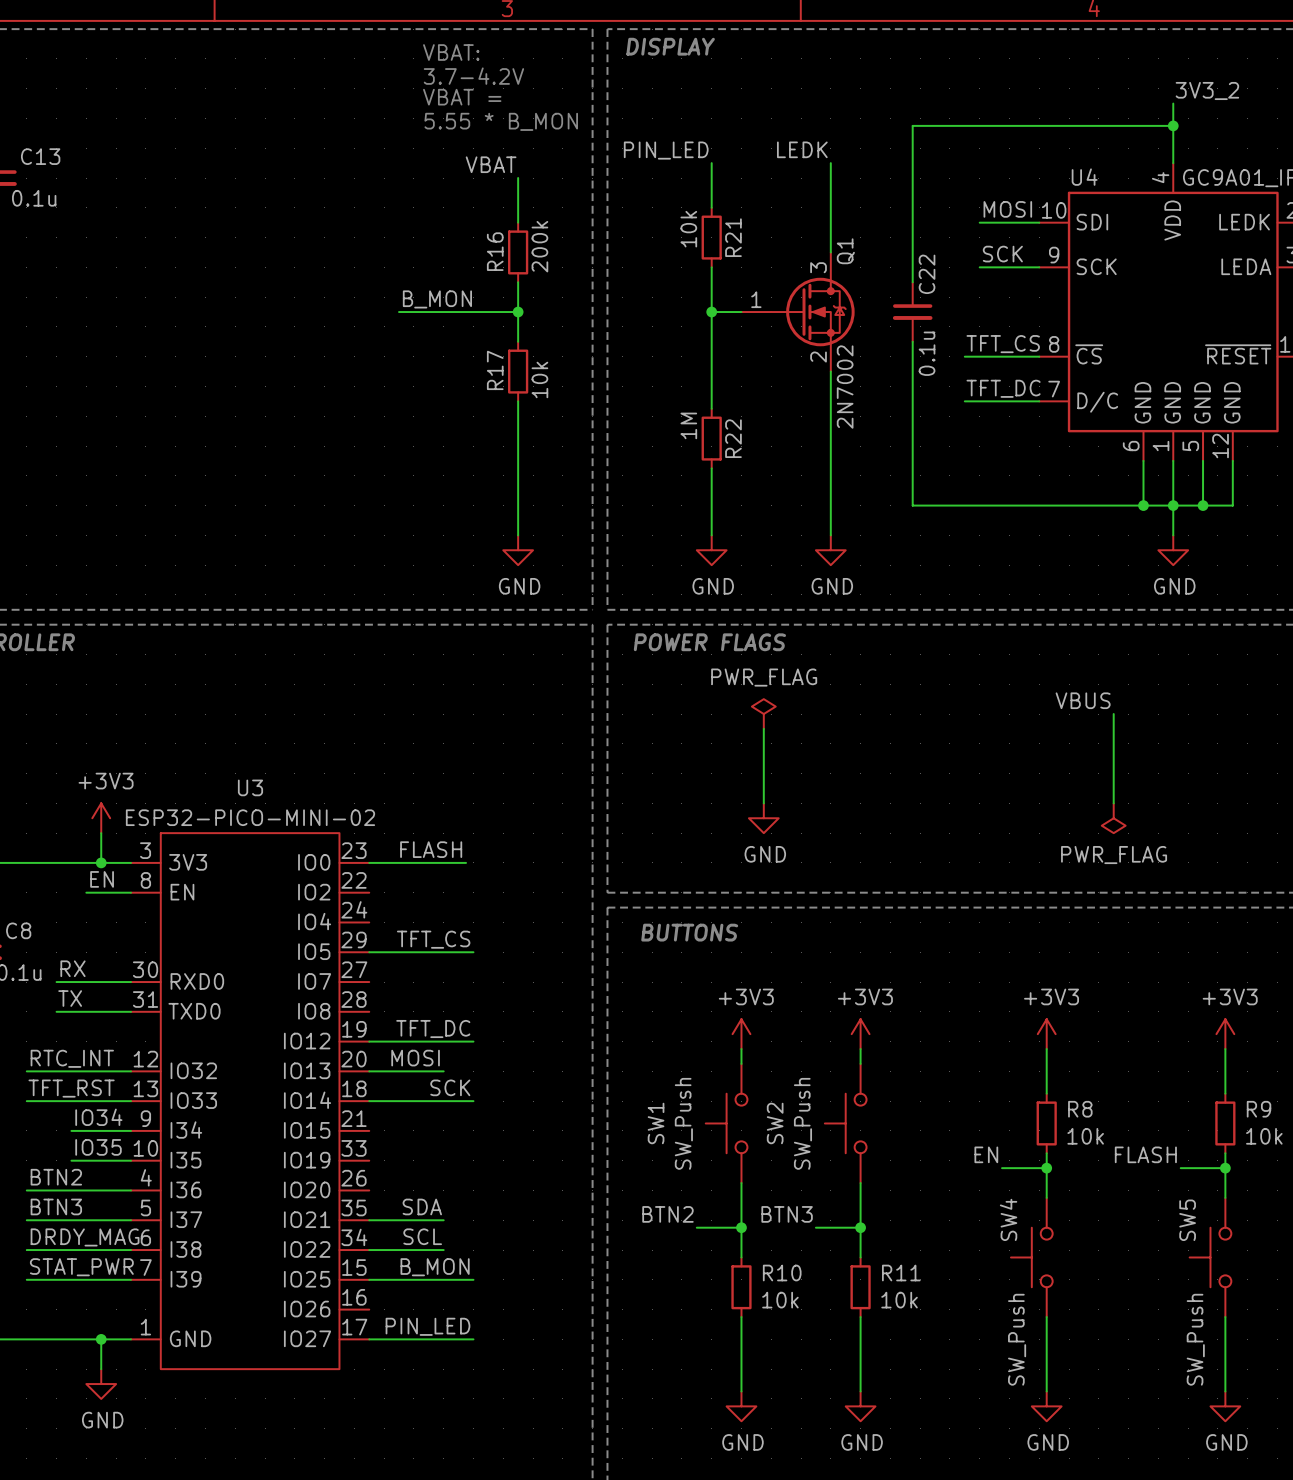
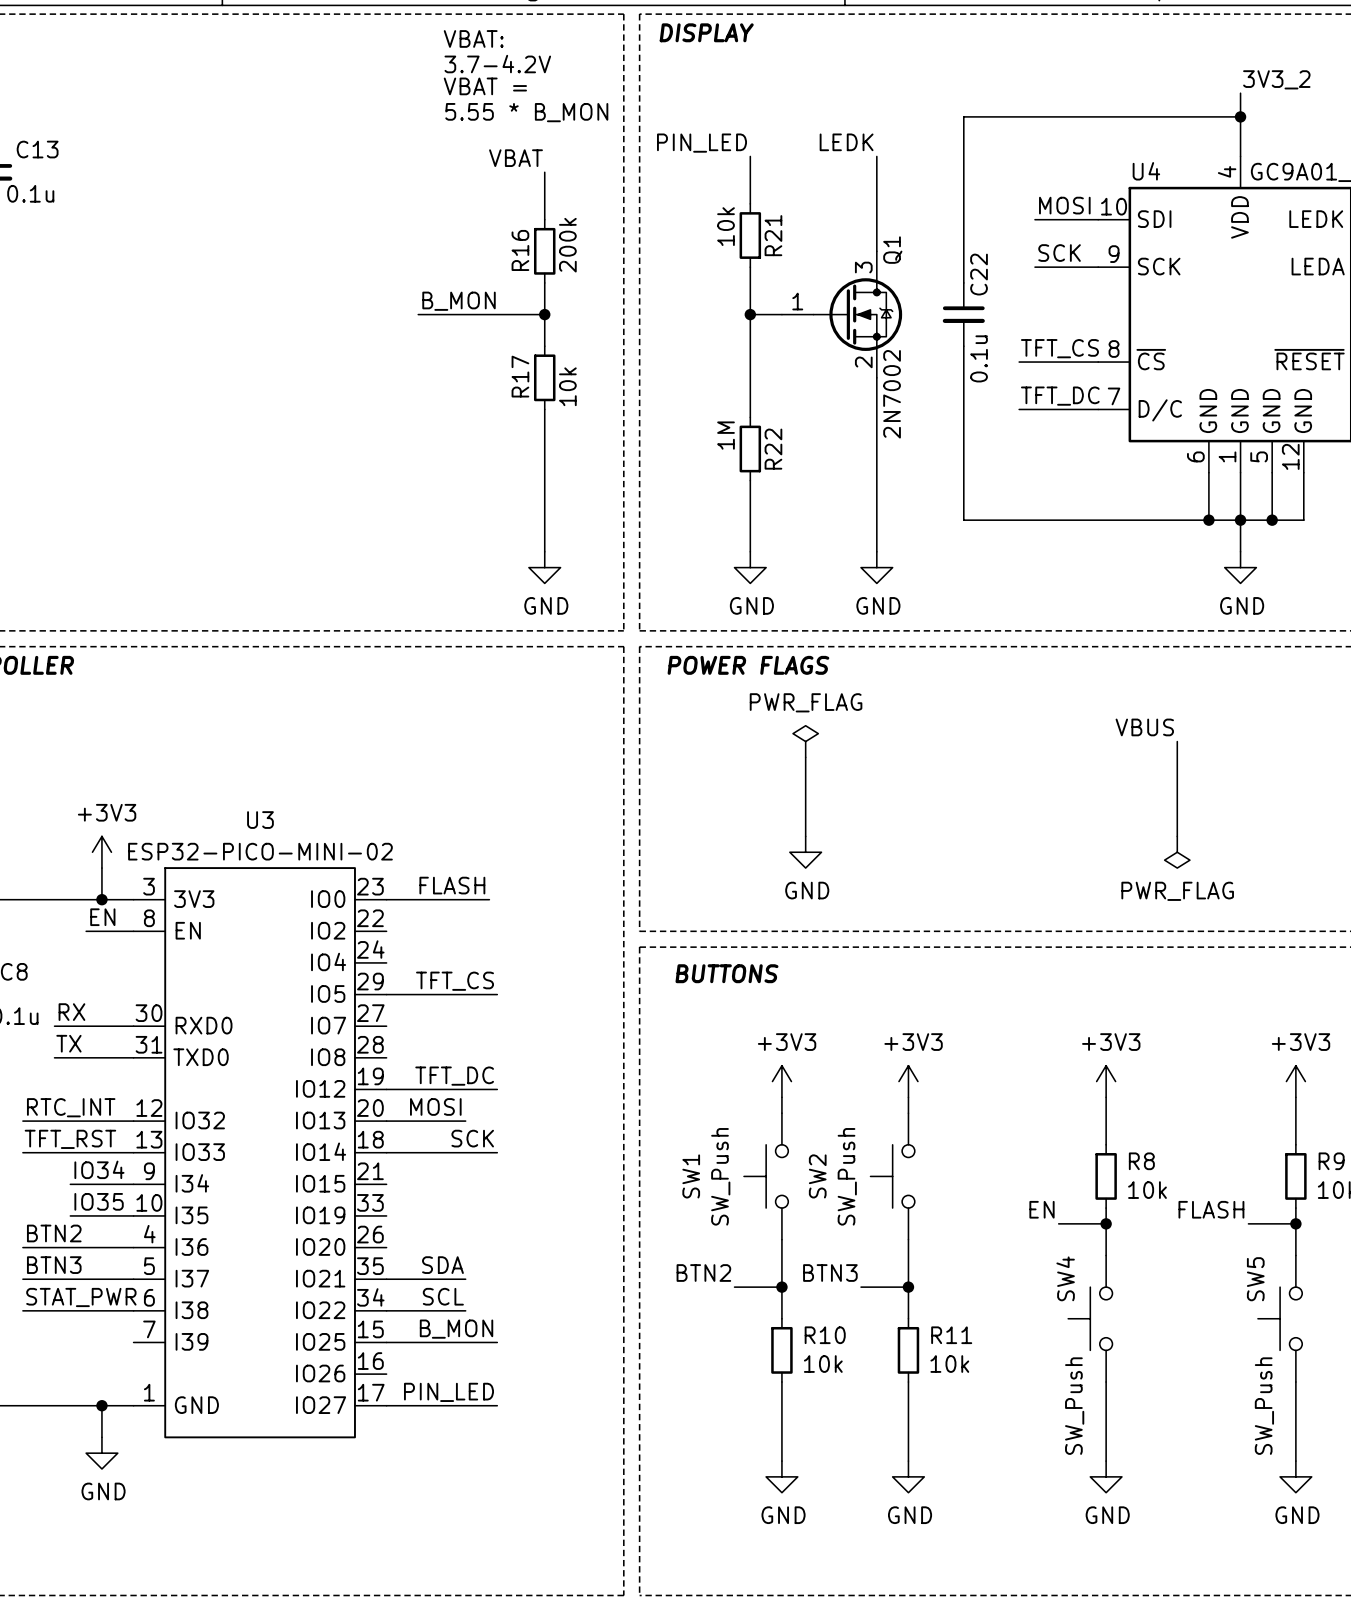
label: DRDY_MAG (85, 1237) -> STAT_PWR (81, 1297)
label: STAT_PWR (81, 1267) -> none
wire: (26, 1279) (131, 1279) -> none

